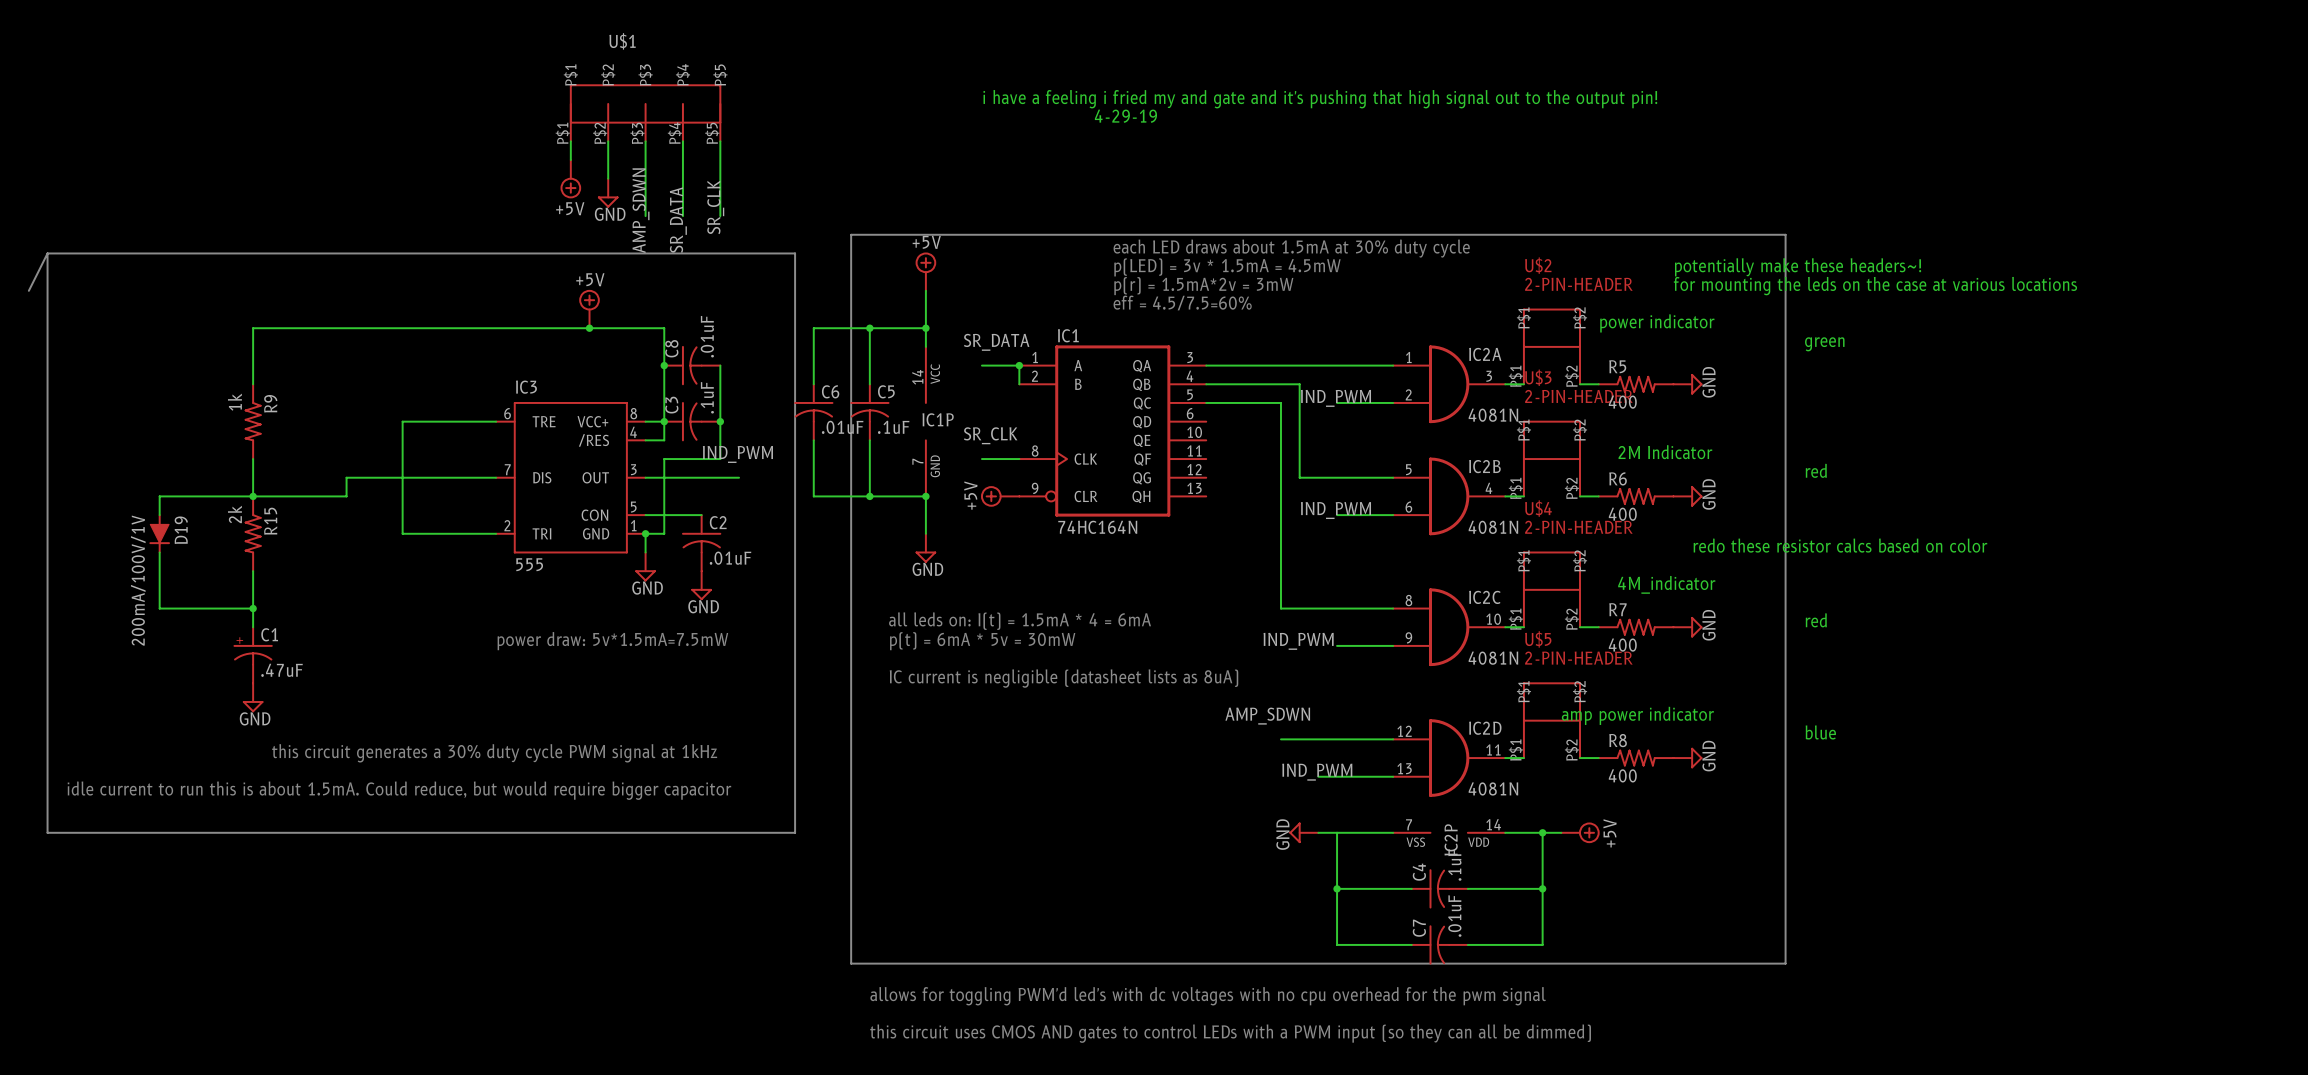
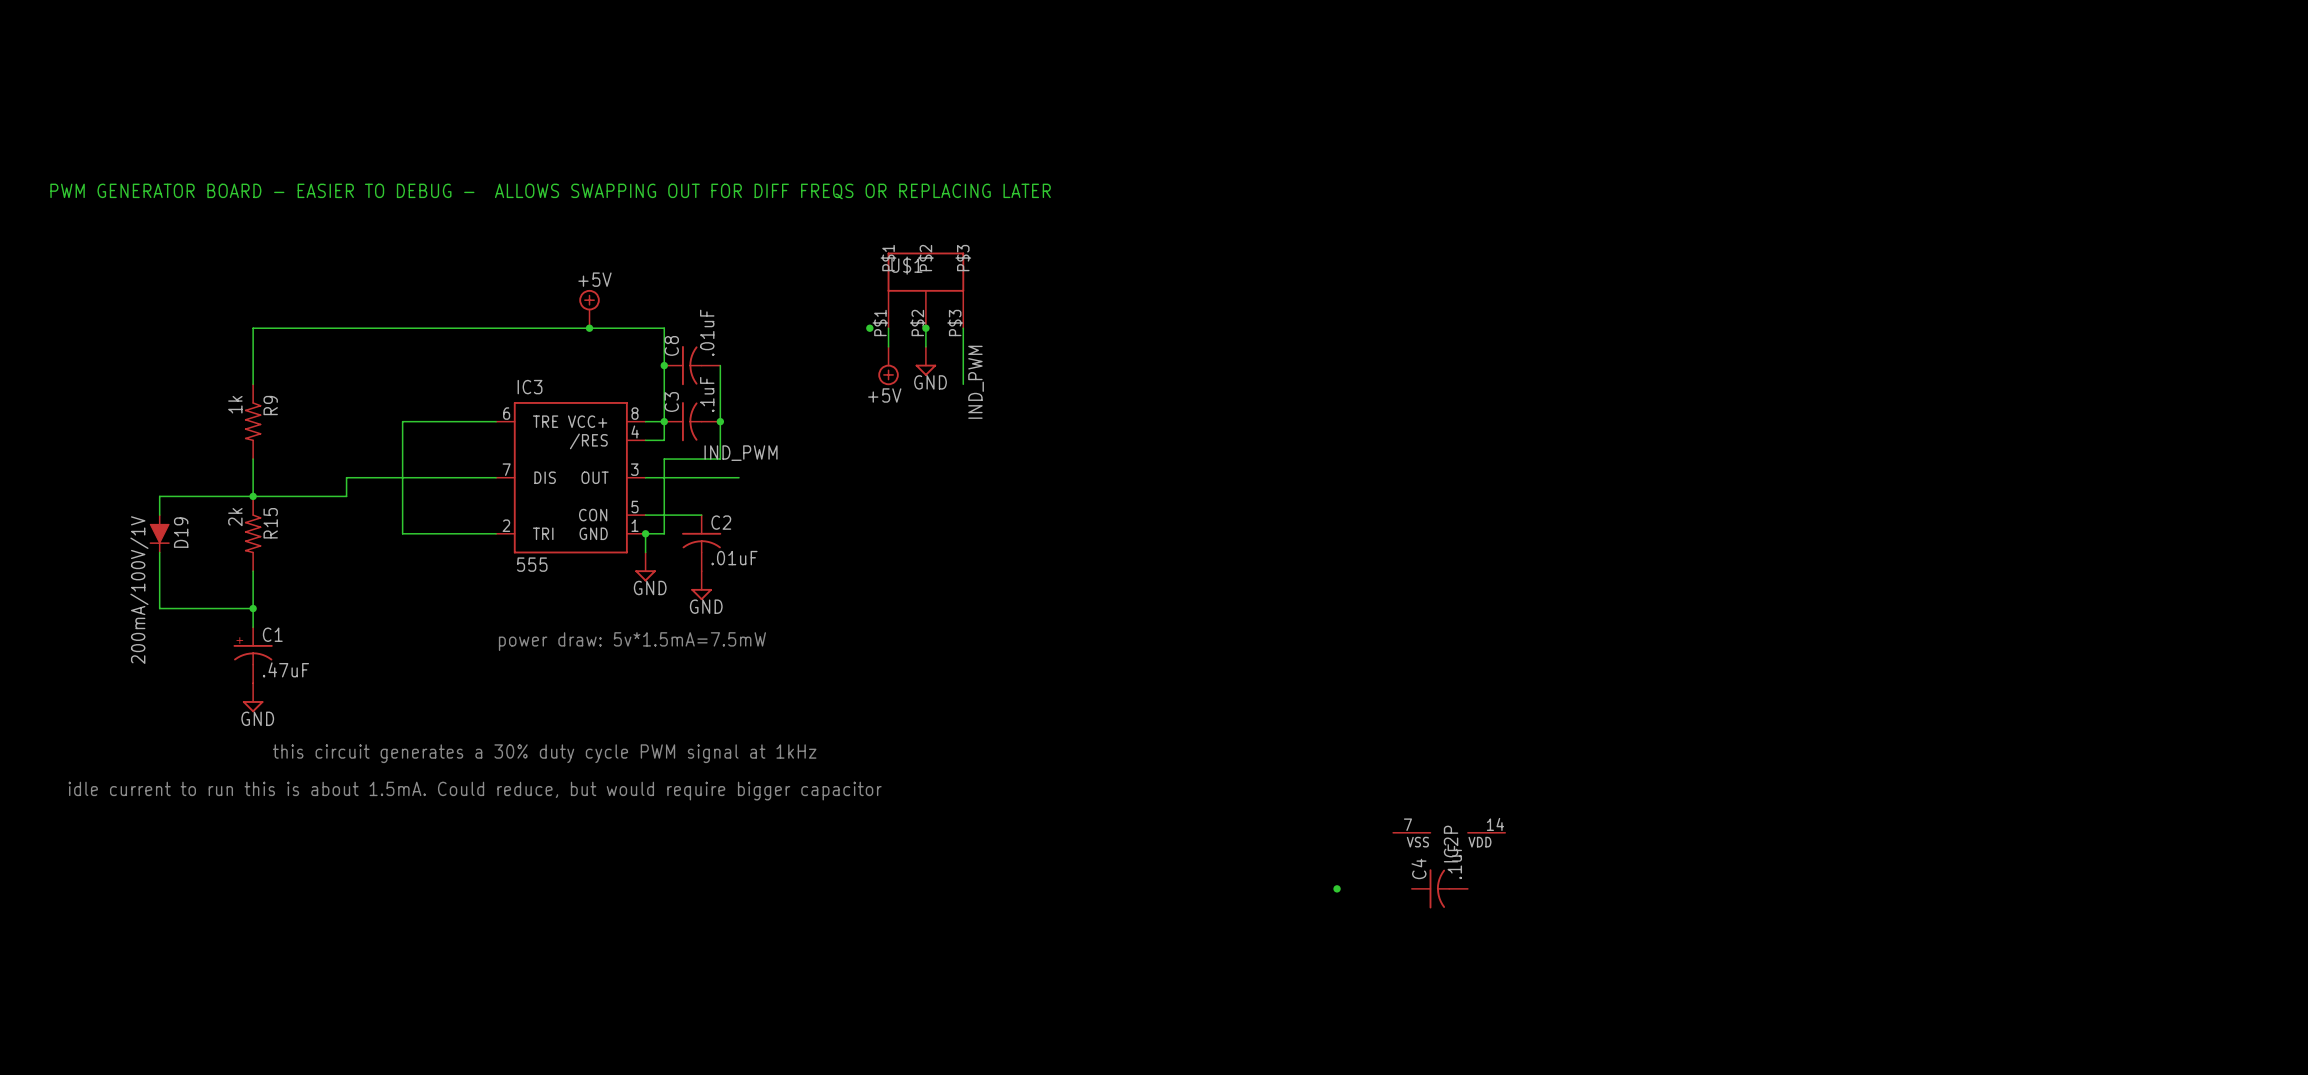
U$1 name position: U$1 (622, 41) -> U$1 (906, 265)
U$1 symbol: [569, 84, 722, 142] -> [887, 252, 965, 329]
text: i have a feeling i fried my and gate and it's pushing that high signal out to the output pin! (1320, 99) -> none
text: 4-29-19 (1125, 116) -> none
wire: (570, 141) (570, 160) -> none
wire: (608, 141) (608, 178) -> none
wire: (645, 141) (645, 216) -> none
wire: (682, 141) (682, 216) -> none
wire: (720, 141) (720, 216) -> none
power symbol: +5V (570, 179) -> none
text: none -> PWM GENERATOR BOARD - EASIER TO DEBUG - ALLOWS SWAPPING OUT FOR DIFF FREQS OR REPLACING LATER (550, 191)
power symbol: GND (608, 193) -> none
label: SR_CLK (715, 207) -> none
label: AMP_SDWN (640, 210) -> none
label: SR_DATA (678, 220) -> none
line: (851, 234) (1785, 234) (1785, 963) (851, 963) (851, 234) -> none
text: each LED draws about 1.5mA at 30% duty cycle (1291, 248) -> none
line: (47, 253) (28, 290) -> none
line: (47, 253) (795, 253) (795, 832) (47, 832) (47, 253) -> none
text: p(LED) = 3v * 1.5mA = 4.5mW (1227, 267) -> none
text: potentially make these headers~! (1798, 267) -> none
power symbol: +5V (925, 271) -> none
text: p(r) = 1.5mA*2v = 3mW (1203, 286) -> none
text: for mounting the leds on the case at various locations (1875, 286) -> none
wire: (925, 290) (925, 328) (813, 328) (813, 384) -> none
text: eff = 4.5/7.5=60% (1182, 303) -> none
text: power indicator (1657, 323) -> none
wire: (869, 328) (869, 384) -> (963, 328) (963, 384)
wire: none -> (888, 328) (888, 346)
label: SR_DATA (996, 342) -> none
text: green (1824, 344) -> none
U$2: 2-PIN-HEADER (1551, 346) -> none
power symbol: none -> GND (925, 361)
wire: (981, 365) (1019, 365) (1019, 384) -> none
junction: (1019, 365) -> none
wire: (1206, 365) (1393, 365) -> none
power symbol: none -> +5V (888, 366)
wire: (1206, 384) (1299, 384) (1299, 477) (1393, 477) -> none
IC2A: 4081N (1449, 384) -> none
wire: (1505, 384) (1523, 384) -> none
wire: (1580, 384) (1598, 384) -> none
R5: 400 (1636, 384) -> none
power symbol: GND (1687, 384) -> none
label: none -> IND_PWM (976, 382)
label: IND_PWM (1335, 398) -> none
wire: (1206, 402) (1280, 402) (1280, 608) (1393, 608) -> none
wire: (1337, 402) (1393, 402) -> none
C6: .01uF (813, 412) -> none
C5: .1uF (869, 412) -> none
IC1P: (925, 421) -> none
IC1: 74HC164N (1112, 431) -> none
label: SR_CLK (990, 435) -> none
wire: (813, 440) (813, 496) (925, 496) (925, 533) -> none
wire: (869, 440) (869, 496) -> none
text: 2M Indicator (1665, 452) -> none
U$3: 2-PIN-HEADER (1551, 458) -> none
wire: (981, 459) (1019, 459) -> none
text: red (1816, 470) -> none
junction: (869, 496) -> none
junction: (925, 496) -> none
power symbol: +5V (1000, 496) -> none
IC2B: 4081N (1449, 496) -> none
wire: (1505, 496) (1523, 496) -> none
wire: (1580, 496) (1598, 496) -> none
R6: 400 (1636, 496) -> none
power symbol: GND (1687, 496) -> none
label: IND_PWM (1335, 510) -> none
wire: (1337, 515) (1393, 515) -> none
text: redo these resistor calcs based on color (1840, 545) -> none
power symbol: GND (925, 548) -> none
text: 4M_indicator (1666, 584) -> none
U$4: 2-PIN-HEADER (1551, 589) -> none
text: red (1816, 620) -> none
text: all leds on: I(t) = 1.5mA * 4 = 6mA (1020, 621) -> none
IC2C: 4081N (1449, 627) -> none
wire: (1505, 627) (1523, 627) -> none
wire: (1580, 627) (1598, 627) -> none
R7: 400 (1636, 627) -> none
power symbol: GND (1687, 627) -> none
text: p(t) = 6mA * 5v = 30mW (982, 641) -> none
label: IND_PWM (1298, 641) -> none
wire: (1337, 645) (1393, 645) -> none
text: IC current is negligible (datasheet lists as 8uA) (1064, 678) -> none
text: amp power indicator (1637, 715) -> none
label: AMP_SDWN (1267, 716) -> none
U$5: 2-PIN-HEADER (1551, 720) -> none
text: blue (1820, 732) -> none
wire: (1280, 739) (1393, 739) -> none
IC2D: 4081N (1449, 758) -> none
wire: (1505, 758) (1523, 758) -> none
wire: (1580, 758) (1598, 758) -> none
R8: 400 (1636, 758) -> none
power symbol: GND (1687, 758) -> none
label: IND_PWM (1317, 772) -> none
wire: (1318, 776) (1393, 776) -> none
power symbol: GND (1303, 832) -> none
wire: (1318, 832) (1393, 832) -> none
wire: (1337, 832) (1337, 944) (1411, 944) -> none
wire: (1505, 832) (1561, 832) -> none
wire: (1542, 832) (1542, 944) (1467, 944) -> none
junction: (1542, 832) -> none
power symbol: +5V (1580, 832) -> none
wire: (1337, 888) (1411, 888) -> none
wire: (1467, 888) (1542, 888) -> none
junction: (1542, 888) -> none
C7: .01uF (1439, 944) -> none
text: allows for toggling PWM'd led's with dc voltages with no cpu overhead for the pwm signal (1208, 996) -> none
text: this circuit uses CMOS AND gates to control LEDs with a PWM input (so they can all be dimmed) (1230, 1033) -> none

